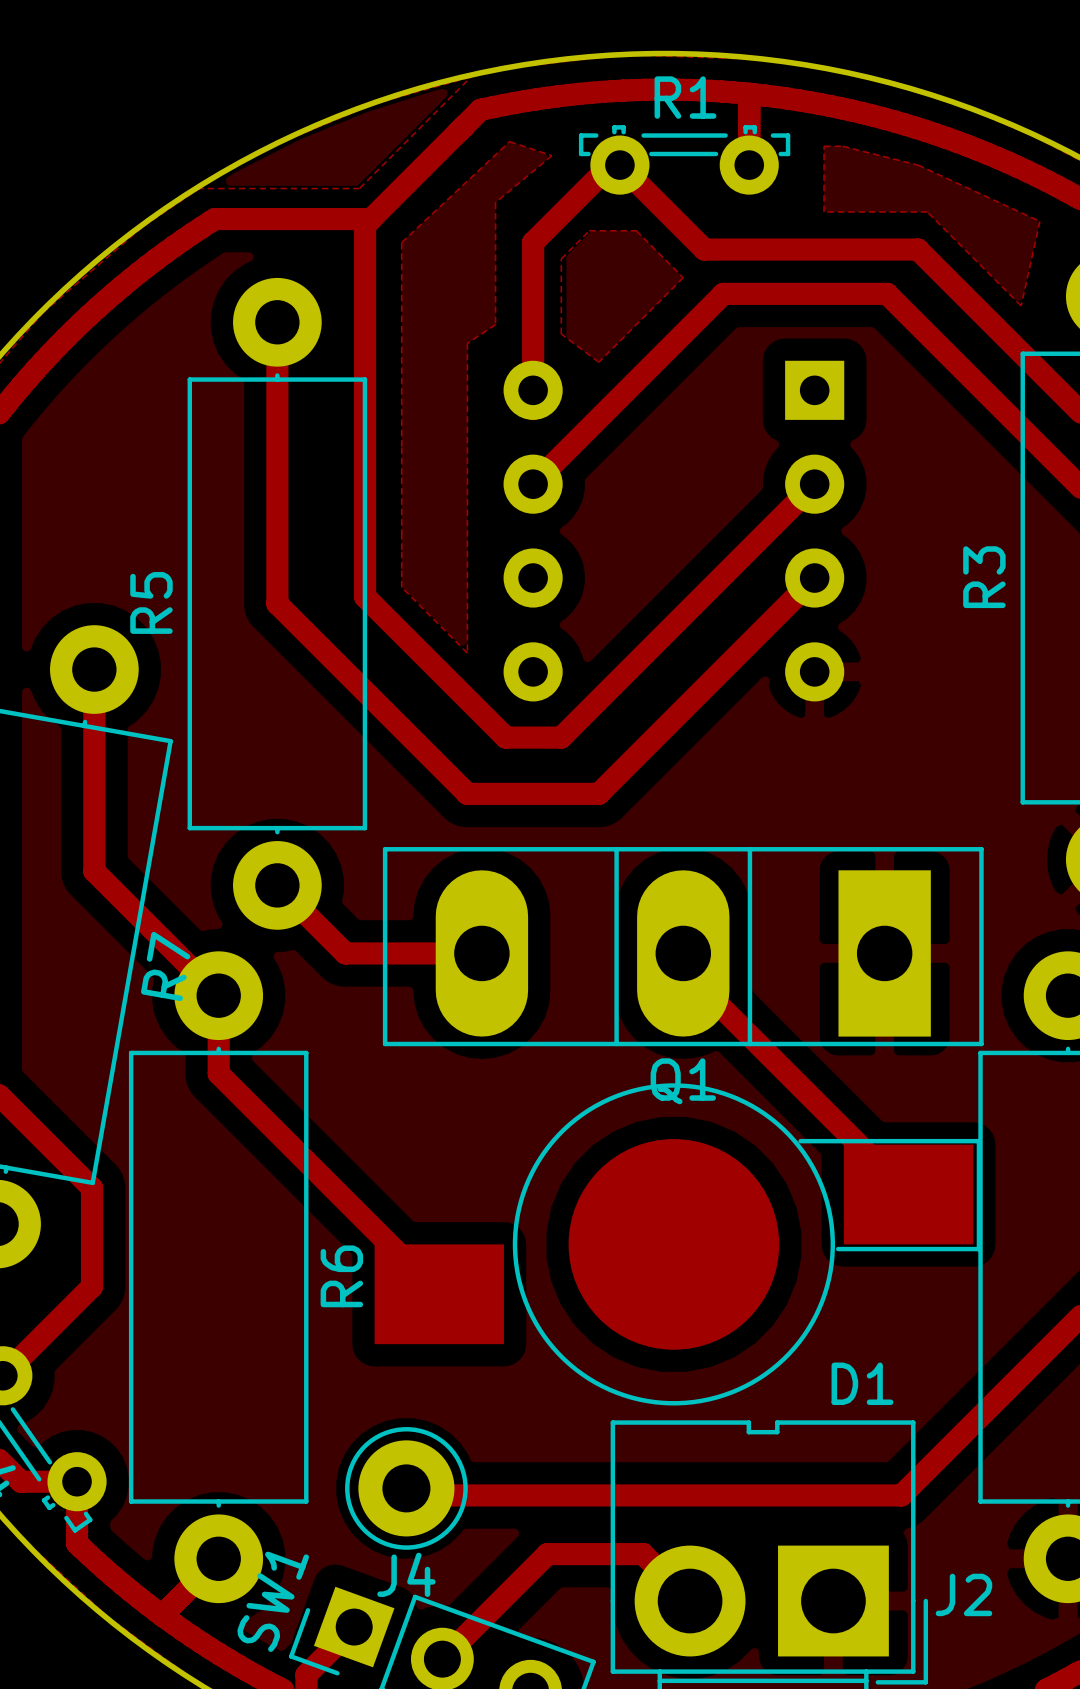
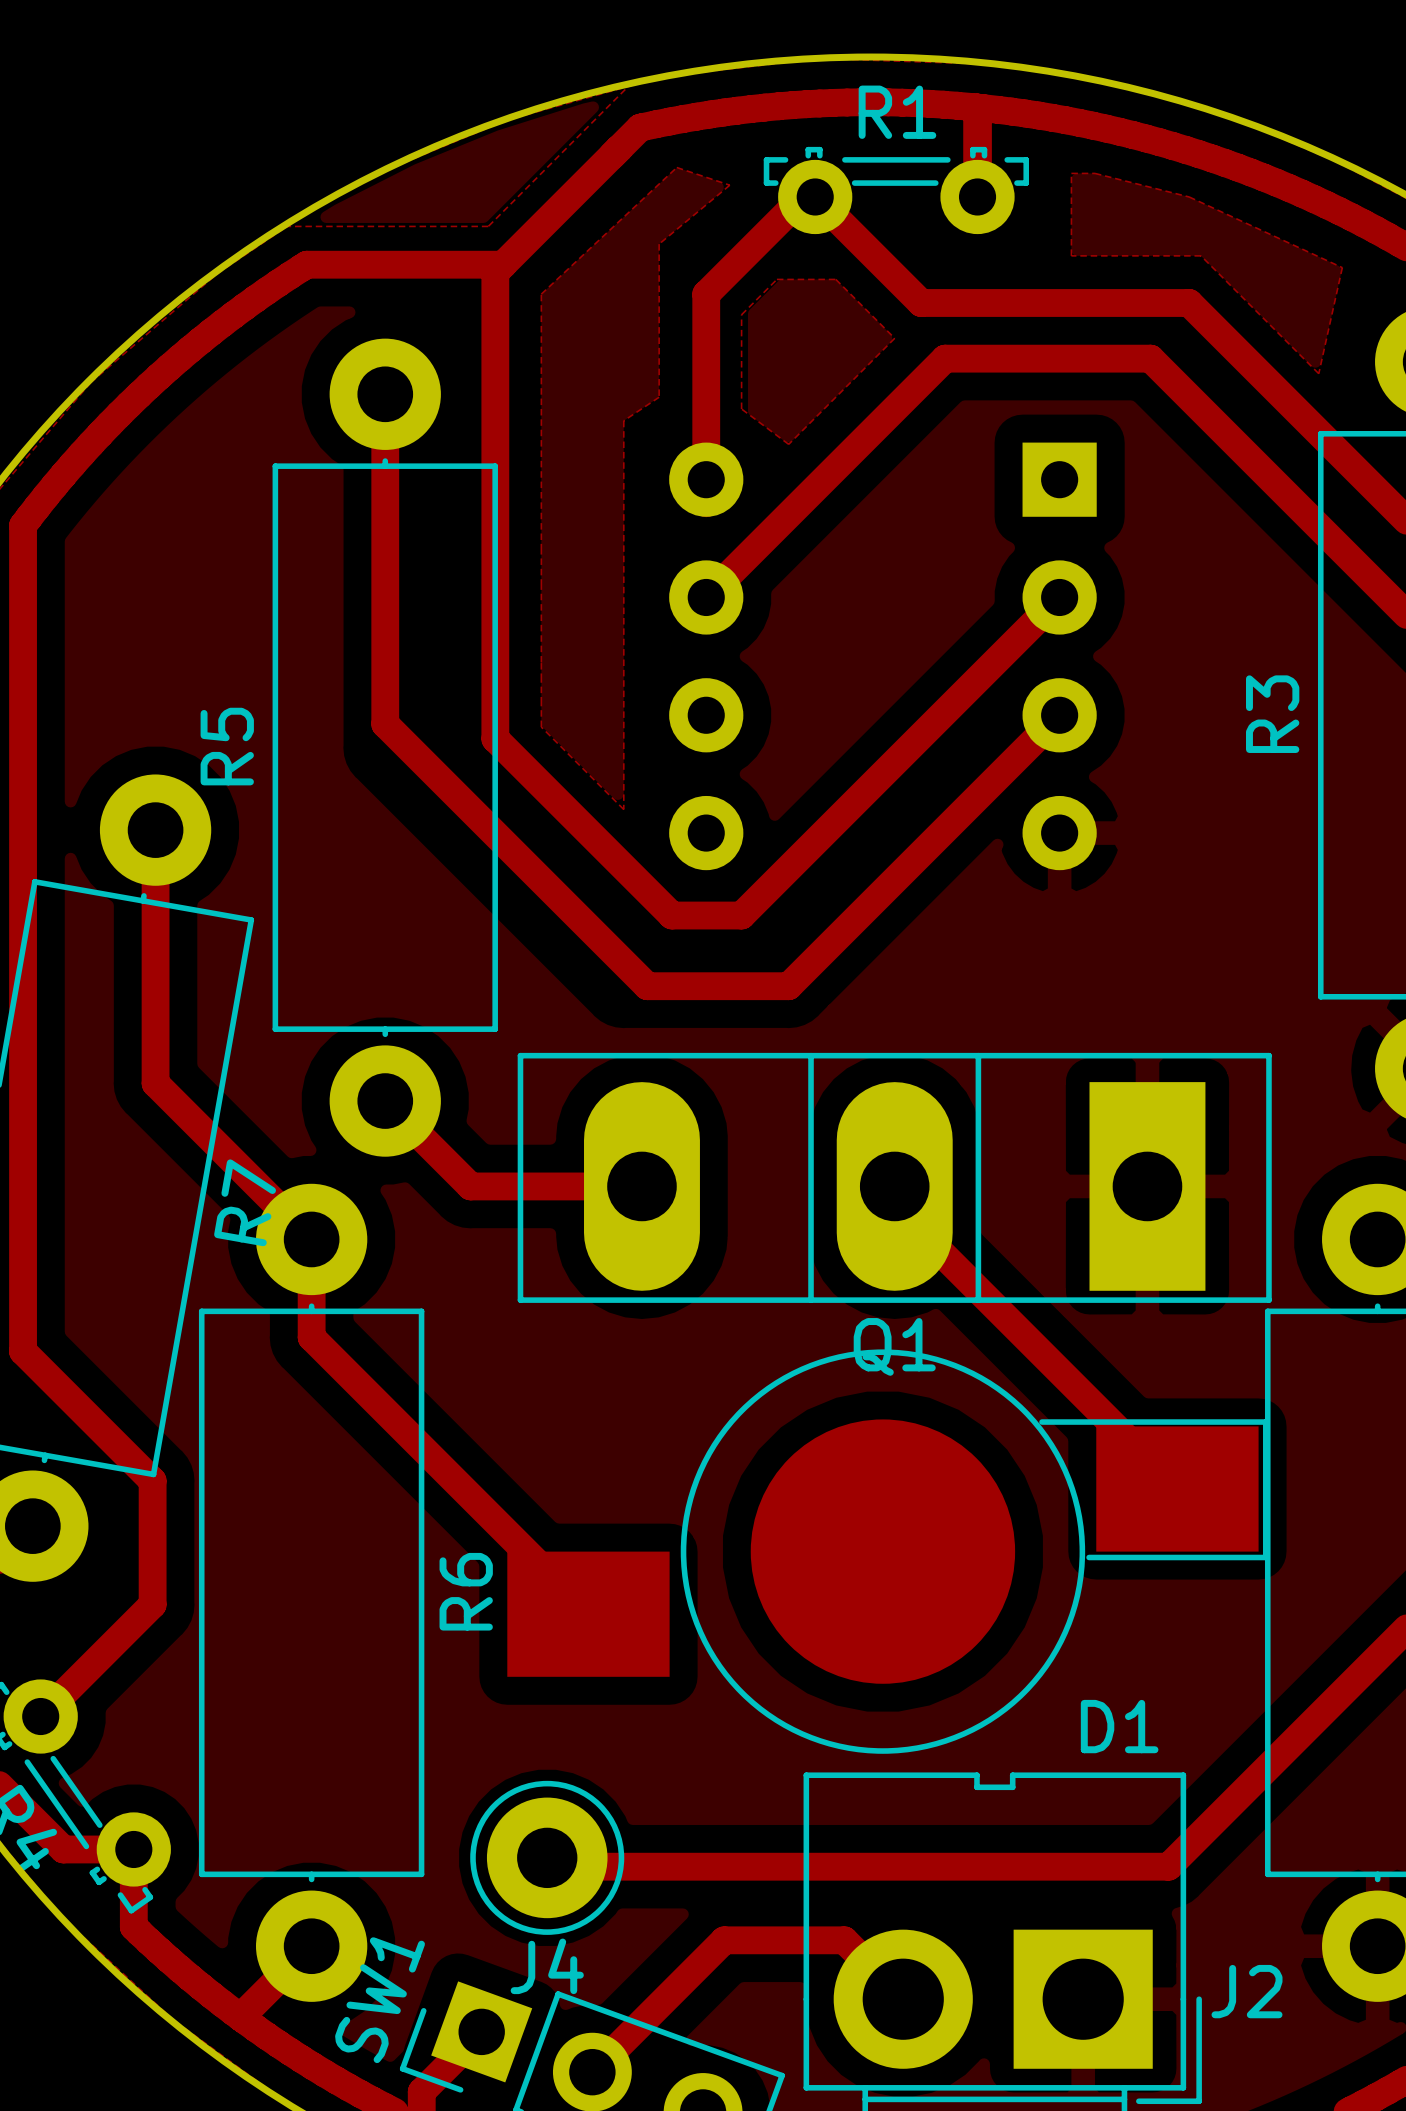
top track: (277, 585) (277, 603) (467, 793) (486, 793) -> (385, 724) (647, 986)

